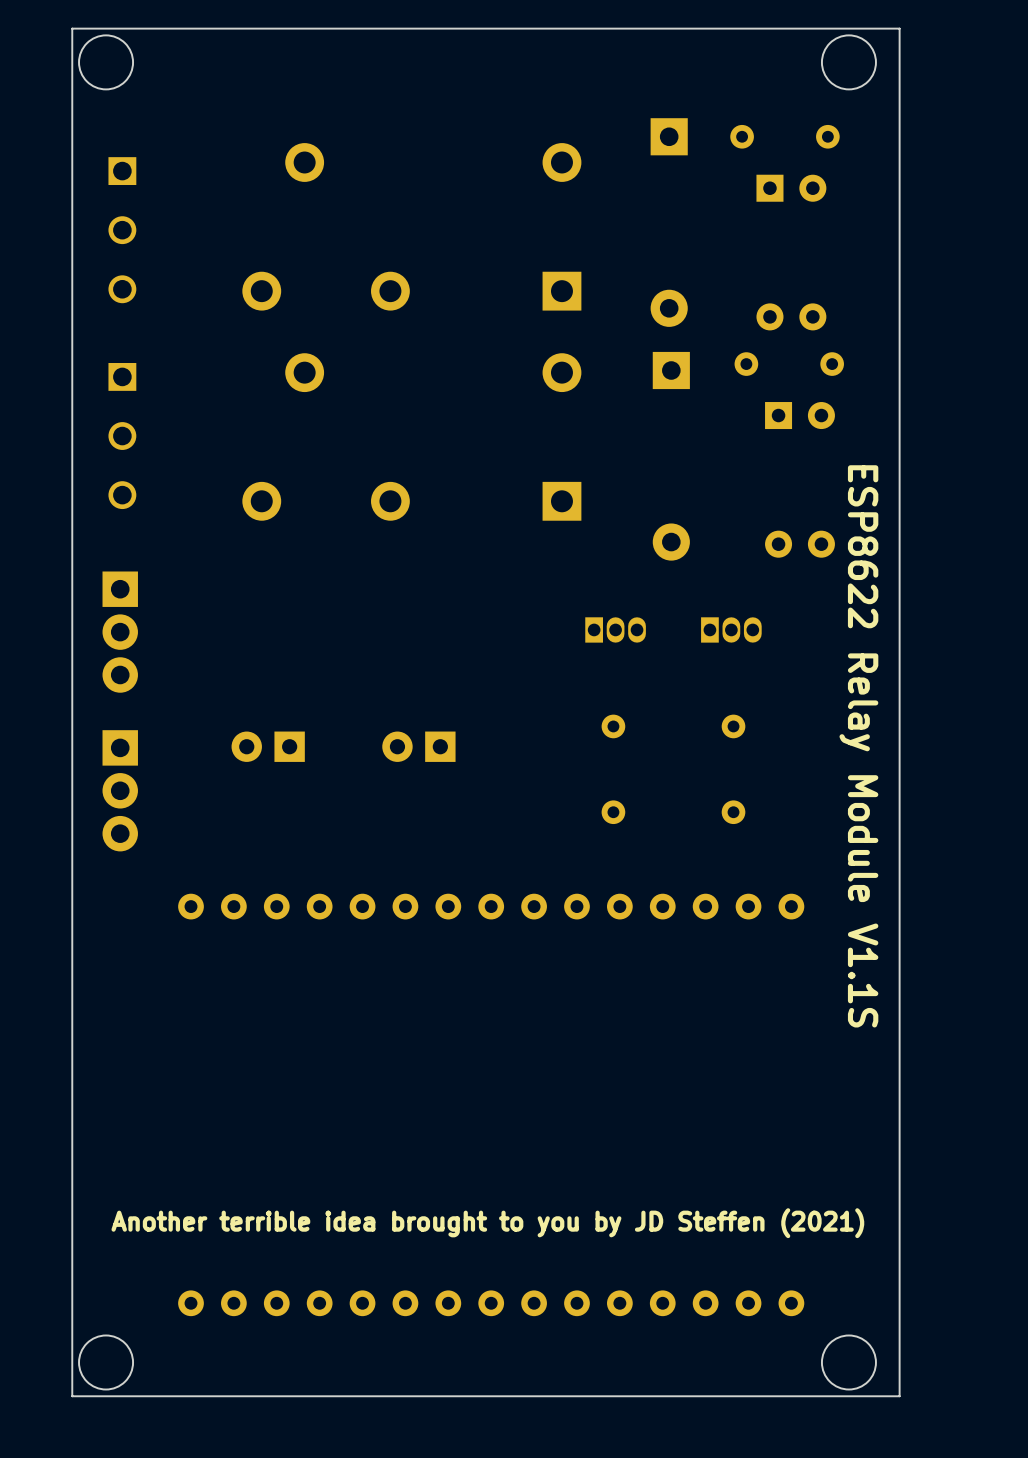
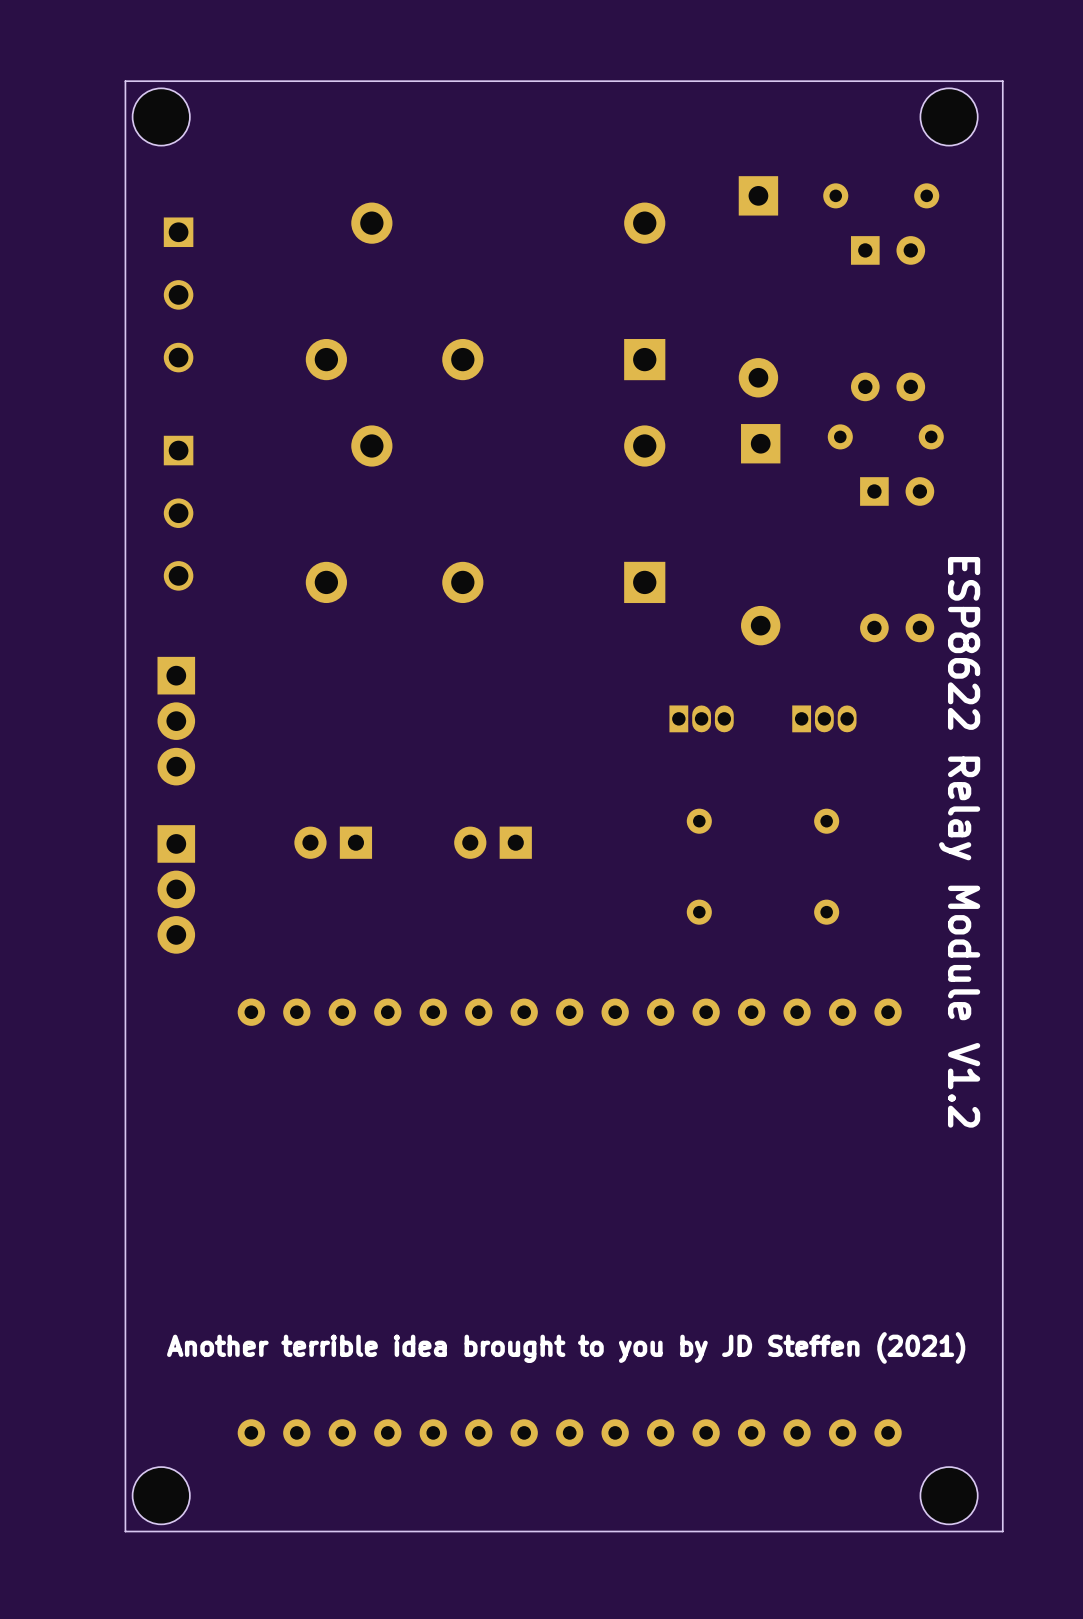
text: ESP8622 Relay Module V1.1S (858, 746) -> ESP8622 Relay Module V1.2 (959, 842)

